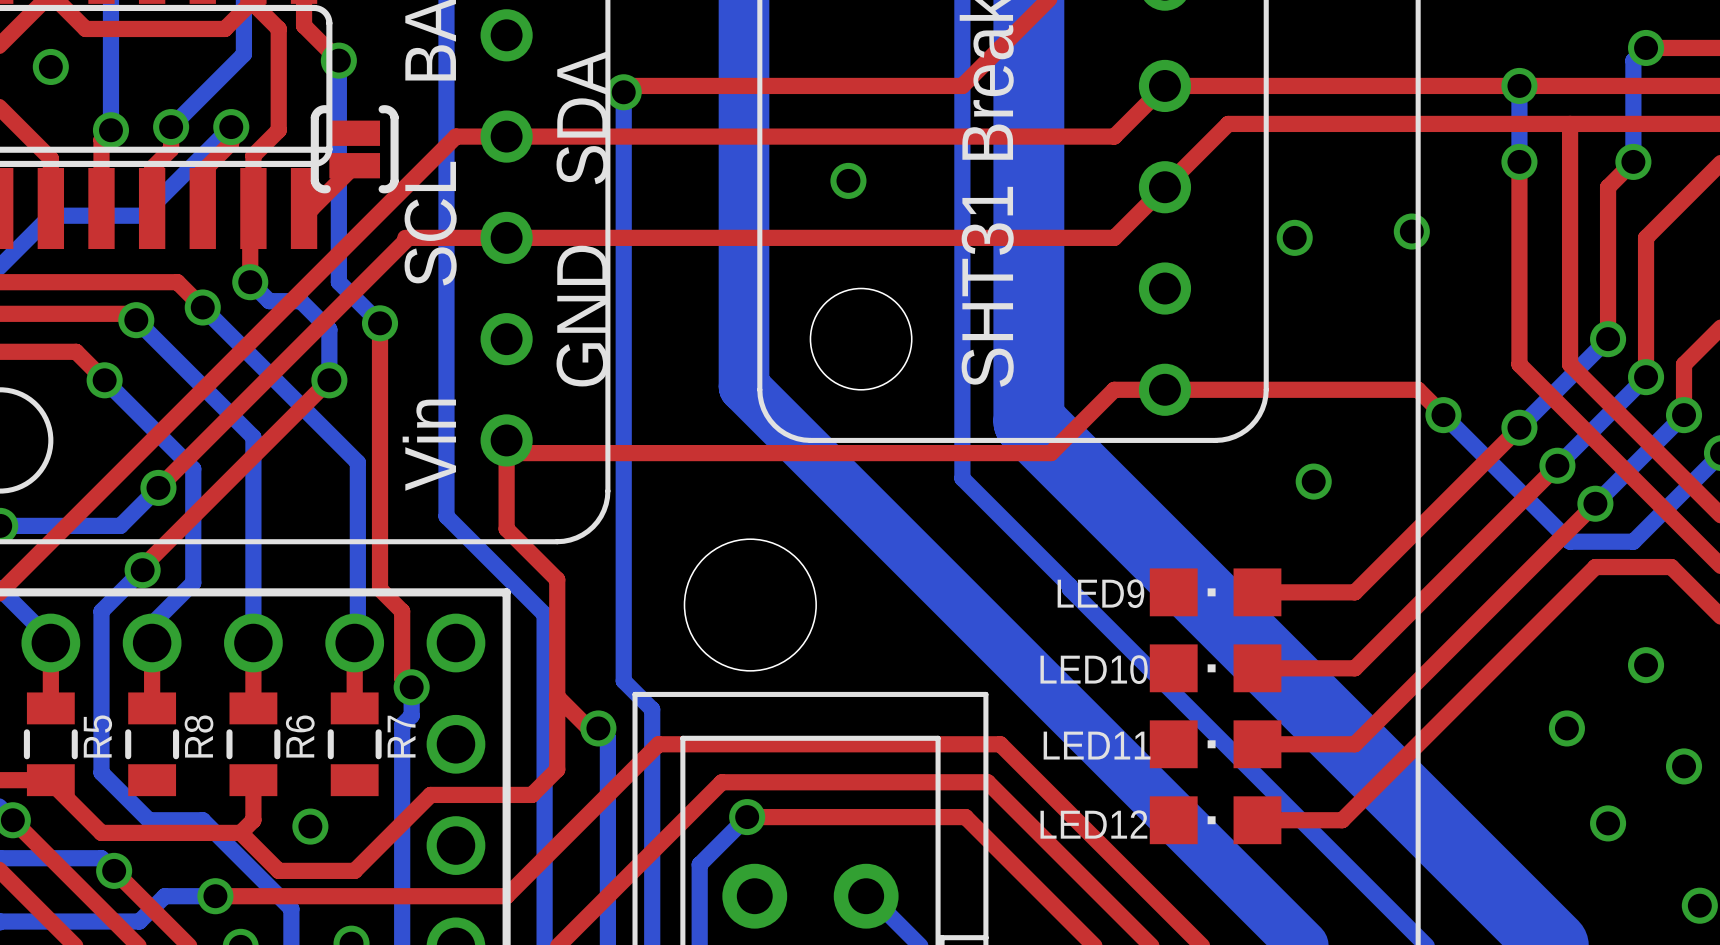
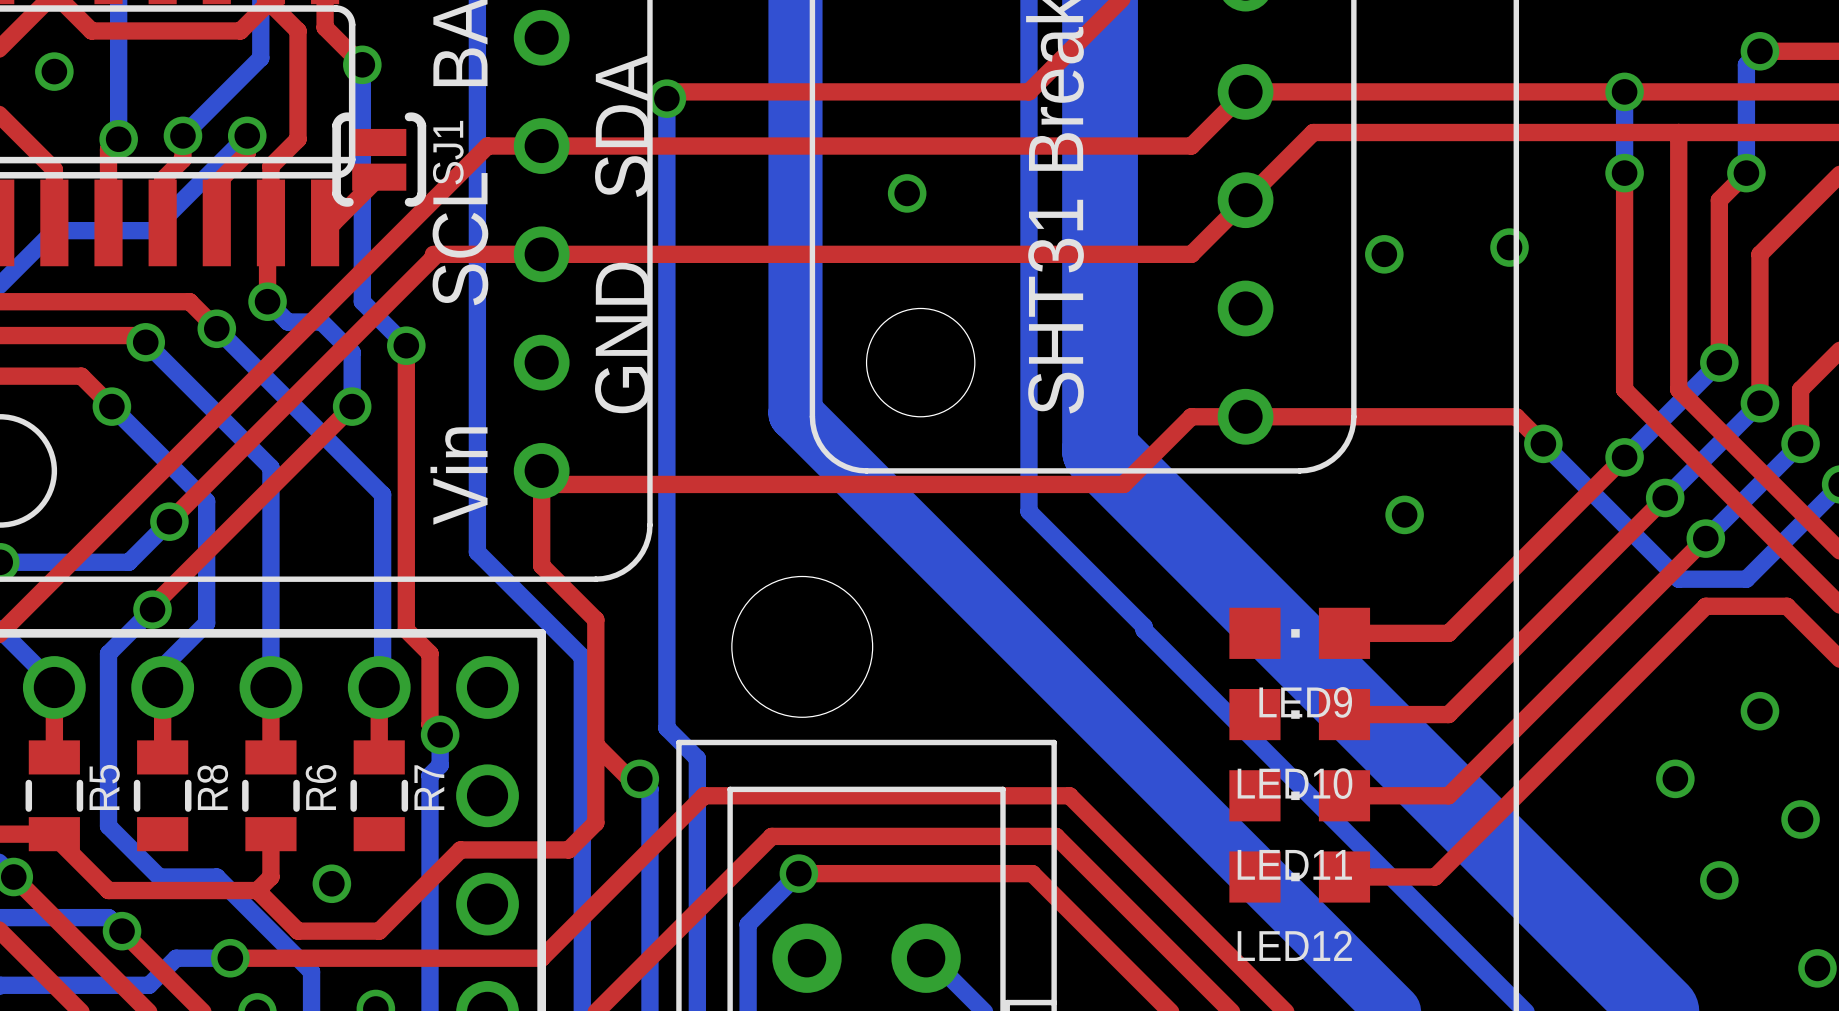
SJ1 name: none -> SJ1 (448, 152)
LED9 name position: LED9 (1100, 593) -> LED9 (1305, 702)
LED10 name position: LED10 (1094, 669) -> LED10 (1295, 783)
LED11 name position: LED11 (1097, 745) -> LED11 (1294, 864)
LED12 name position: LED12 (1093, 824) -> LED12 (1294, 945)

